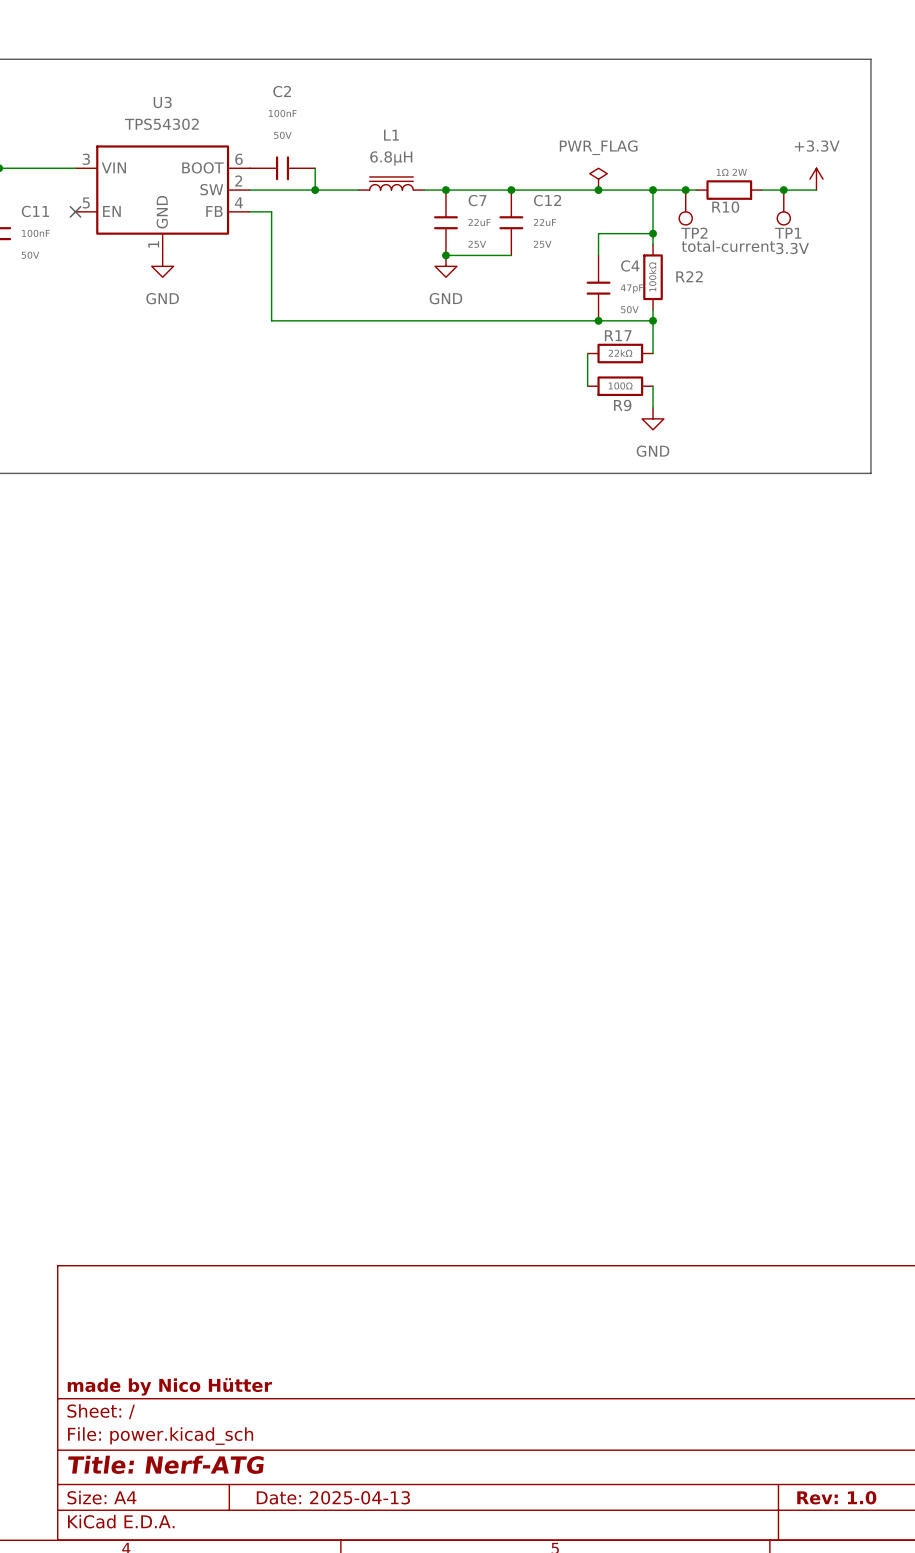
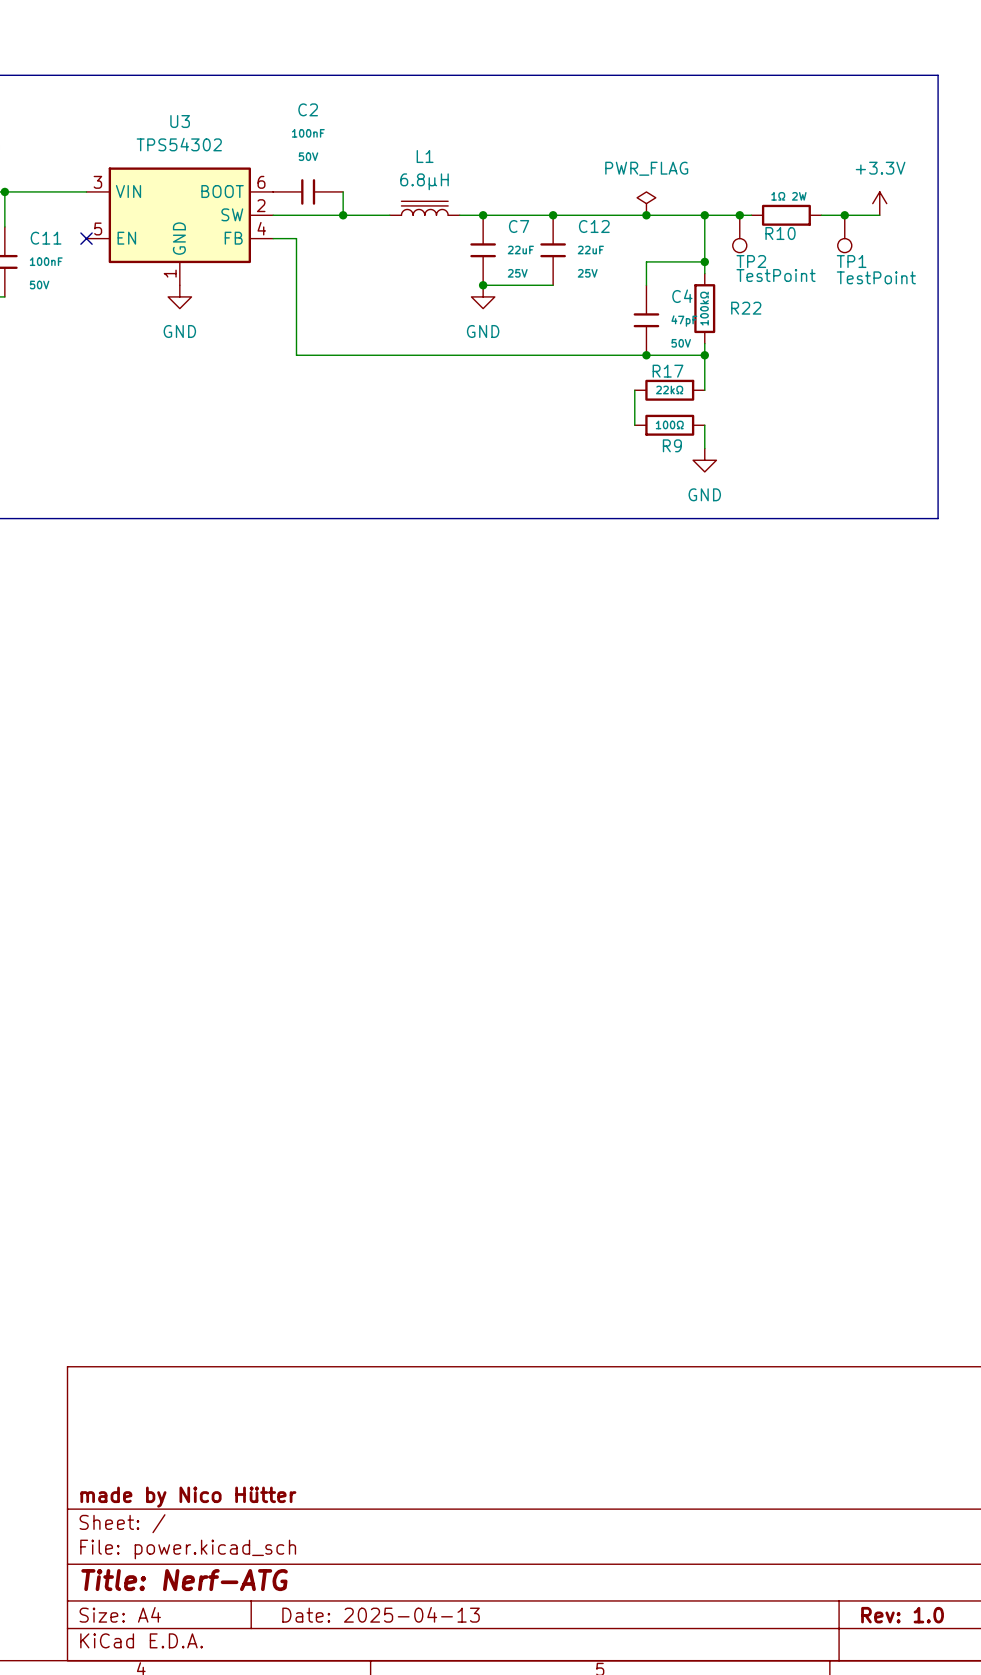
TP2 value: total-current (728, 246) -> TestPoint (776, 275)
TP1 value: 3.3V (792, 248) -> TestPoint (876, 277)

